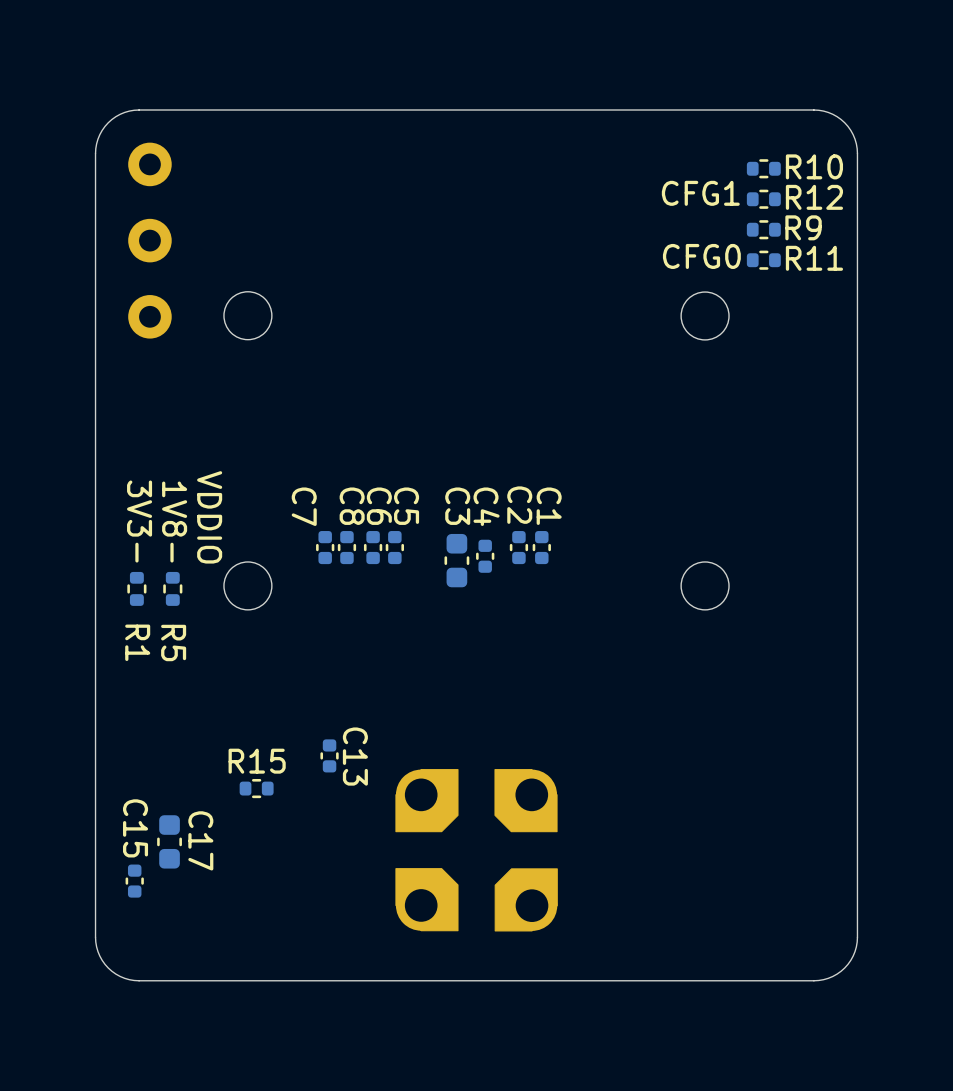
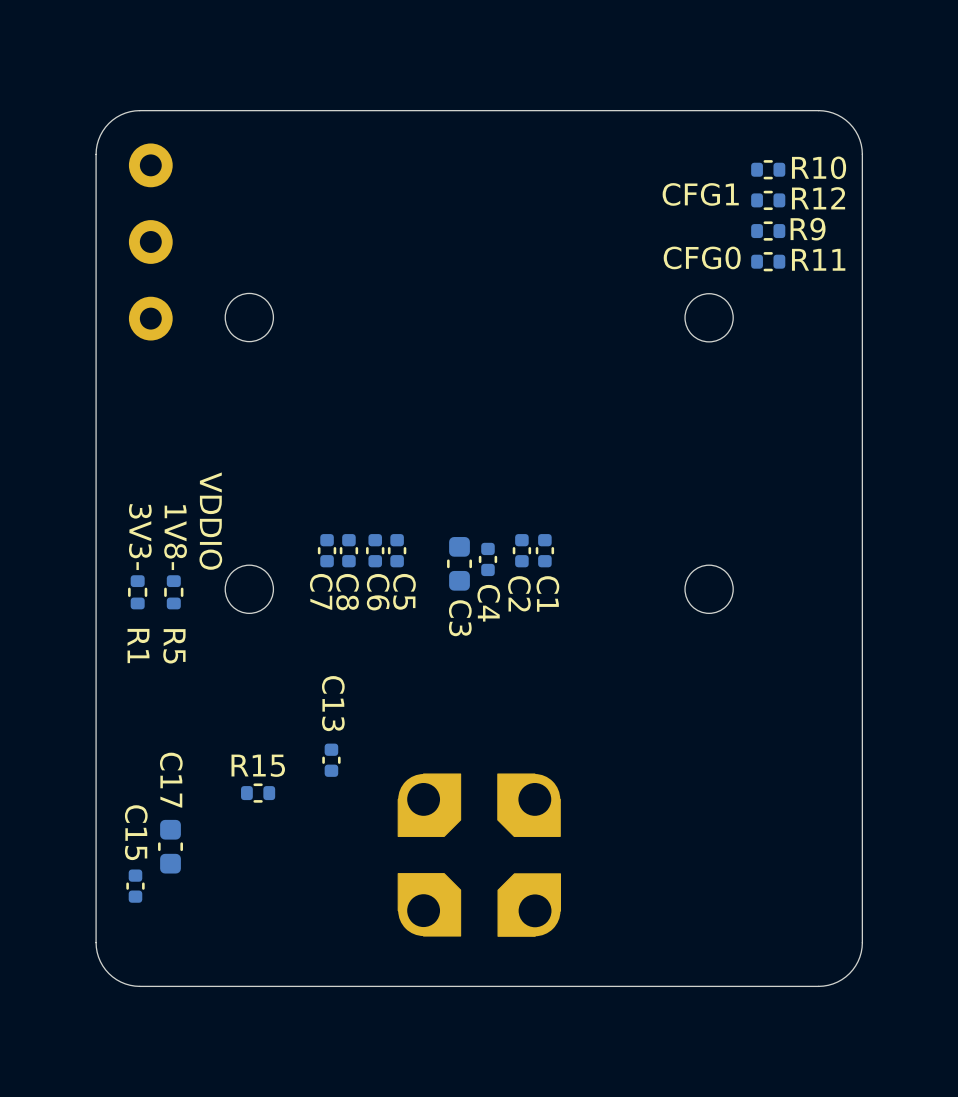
C2 name position: C2 (519, 505) -> C2 (519, 593)
C7 name position: C7 (304, 506) -> C7 (321, 591)
C8 name position: C8 (352, 506) -> C8 (347, 592)
C6 name position: C6 (379, 506) -> C6 (378, 592)
C5 name position: C5 (406, 506) -> C5 (404, 591)
C3 name position: C3 (457, 506) -> C3 (460, 618)
C4 name position: C4 (486, 506) -> C4 (488, 603)
C1 name position: C1 (549, 506) -> C1 (547, 593)
C13 name position: C13 (355, 756) -> C13 (333, 703)
C17 name position: C17 (200, 840) -> C17 (171, 780)

